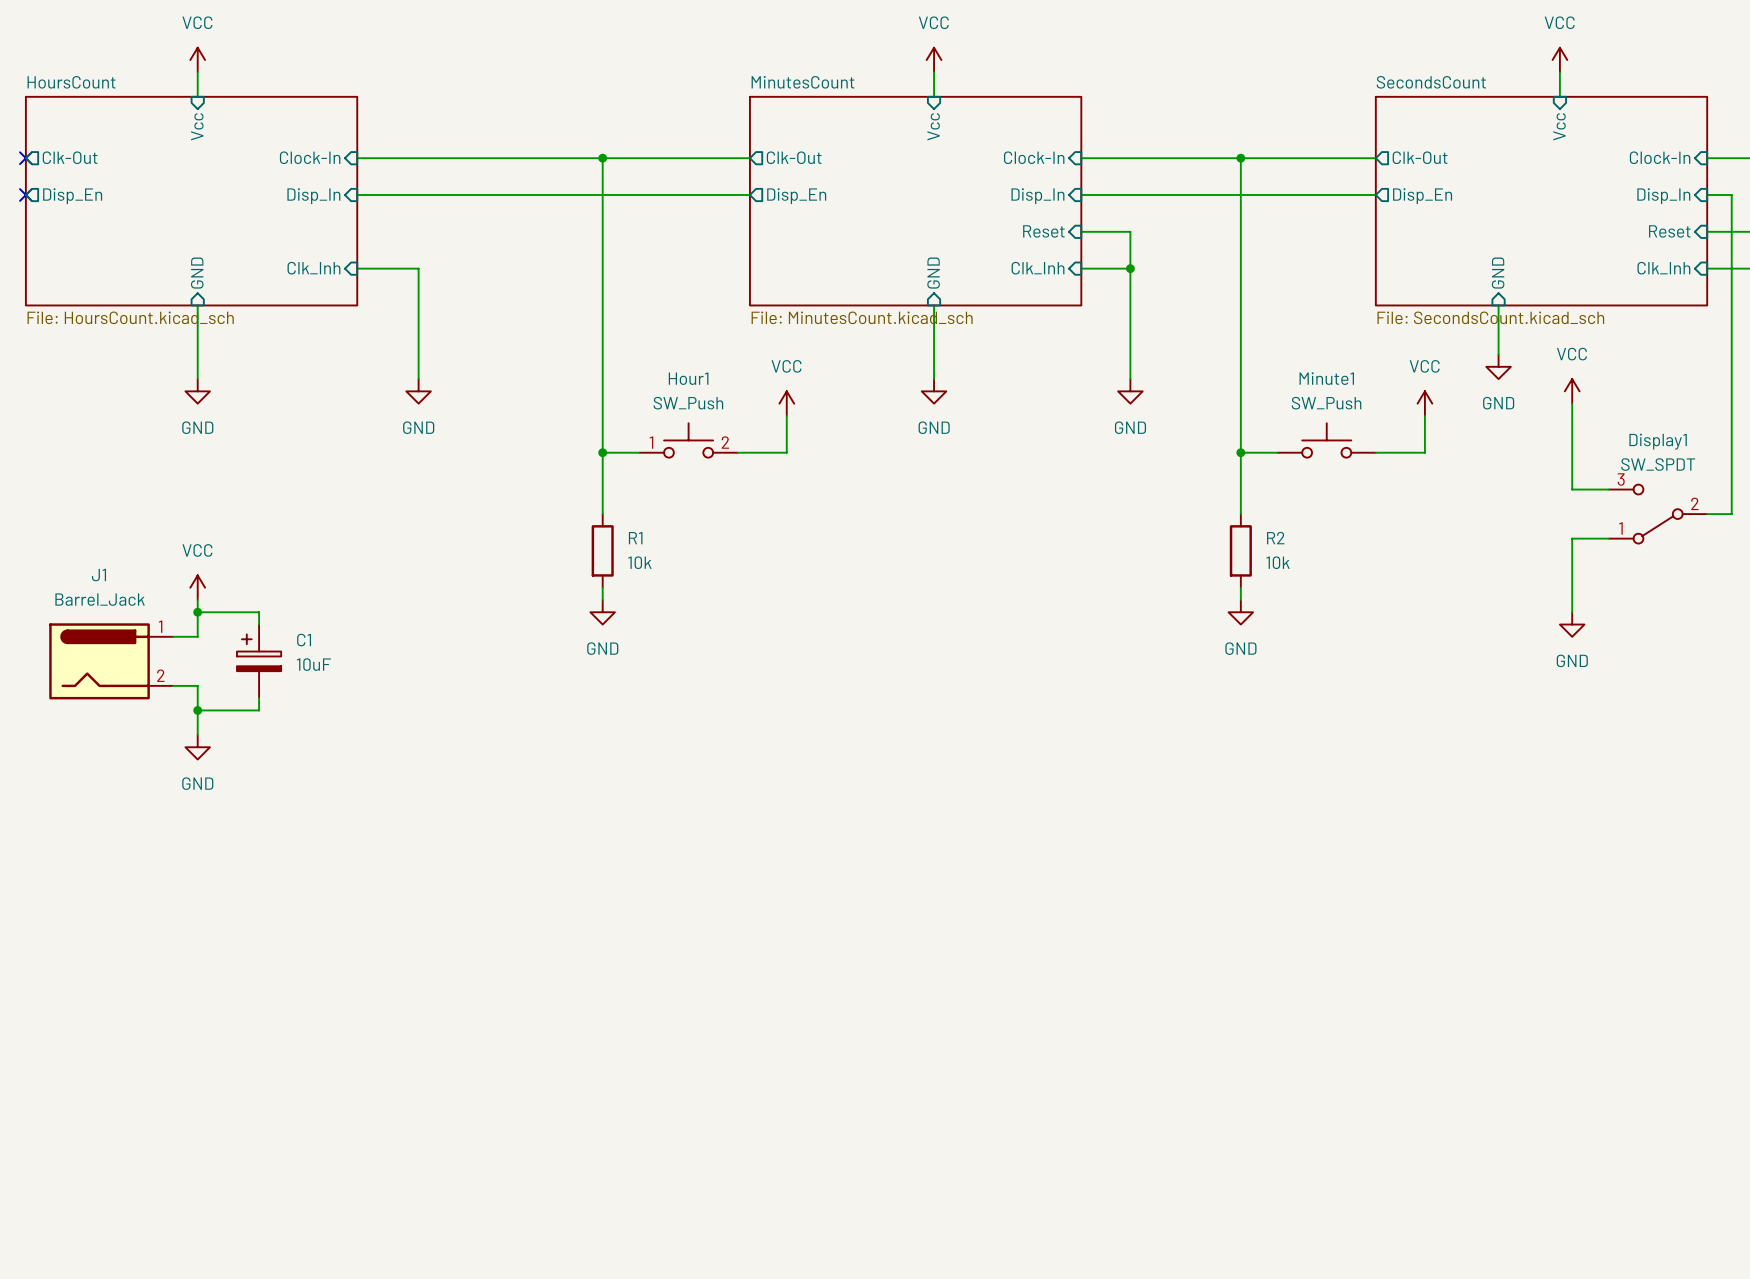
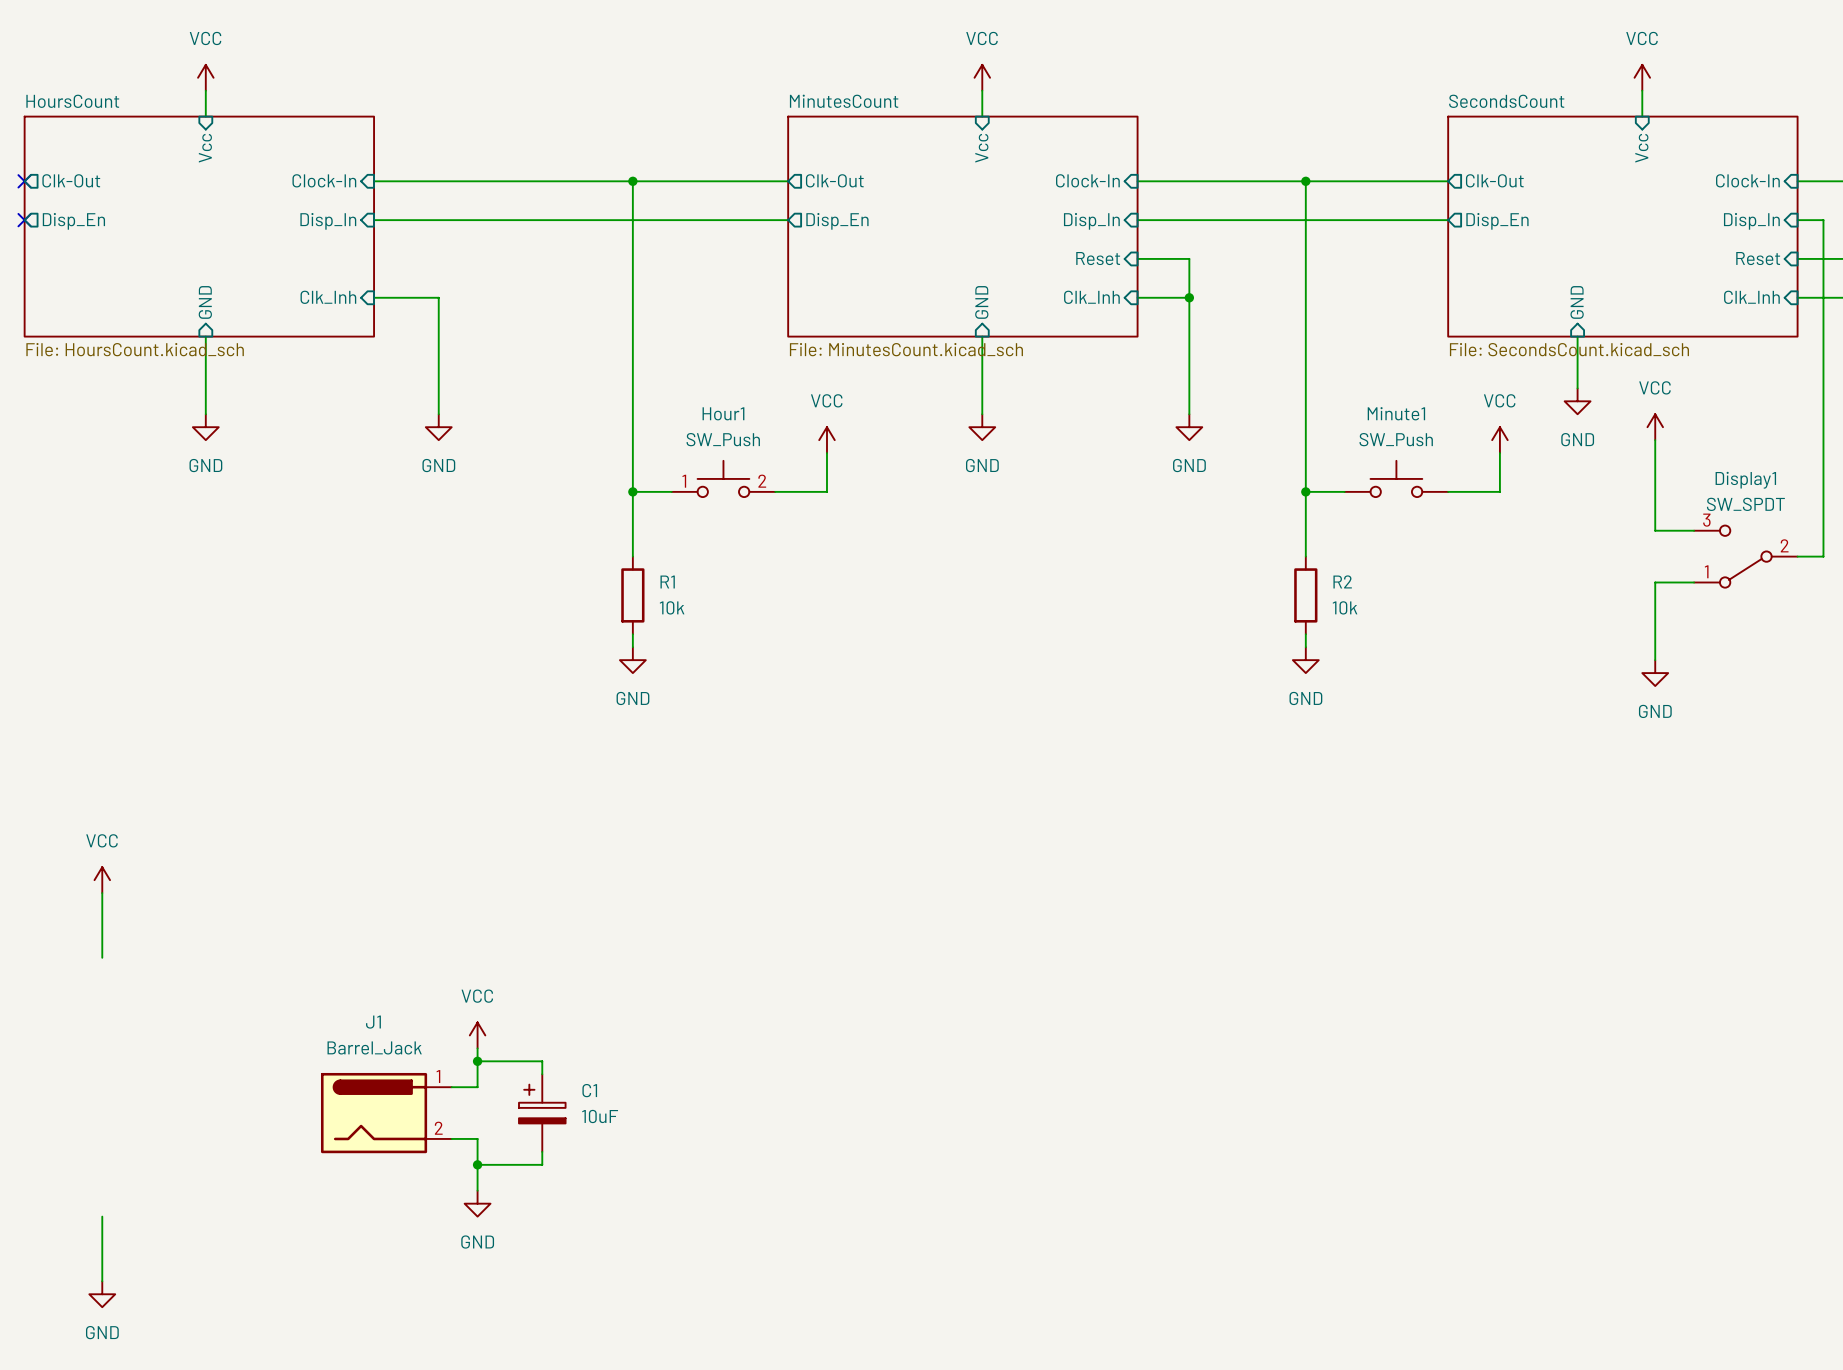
power symbol: VCC (197, 587) -> none
wire: (197, 599) (197, 636) (173, 636) -> none
wire: (197, 612) (259, 612) (259, 624) -> none
junction: (197, 612) -> none
J1 symbol: [49, 623, 174, 700] -> [320, 1072, 452, 1154]
C1 position: (259, 661) -> (542, 1113)
wire: (173, 685) (197, 685) (197, 734) -> none
wire: (259, 698) (259, 710) (197, 710) -> none
junction: (197, 710) -> none
power symbol: GND (197, 747) -> none
power symbol: none -> VCC (102, 880)
wire: none -> (102, 893) (102, 957)
power symbol: none -> VCC (477, 1035)
wire: none -> (477, 1048) (477, 1087) (451, 1087)
wire: none -> (477, 1061) (542, 1061) (542, 1074)
junction: none -> (477, 1061)
wire: none -> (451, 1138) (477, 1138) (477, 1190)
wire: none -> (542, 1151) (542, 1164) (477, 1164)
junction: none -> (477, 1164)
power symbol: none -> GND (477, 1203)
wire: none -> (102, 1216) (102, 1281)
power symbol: none -> GND (102, 1294)

